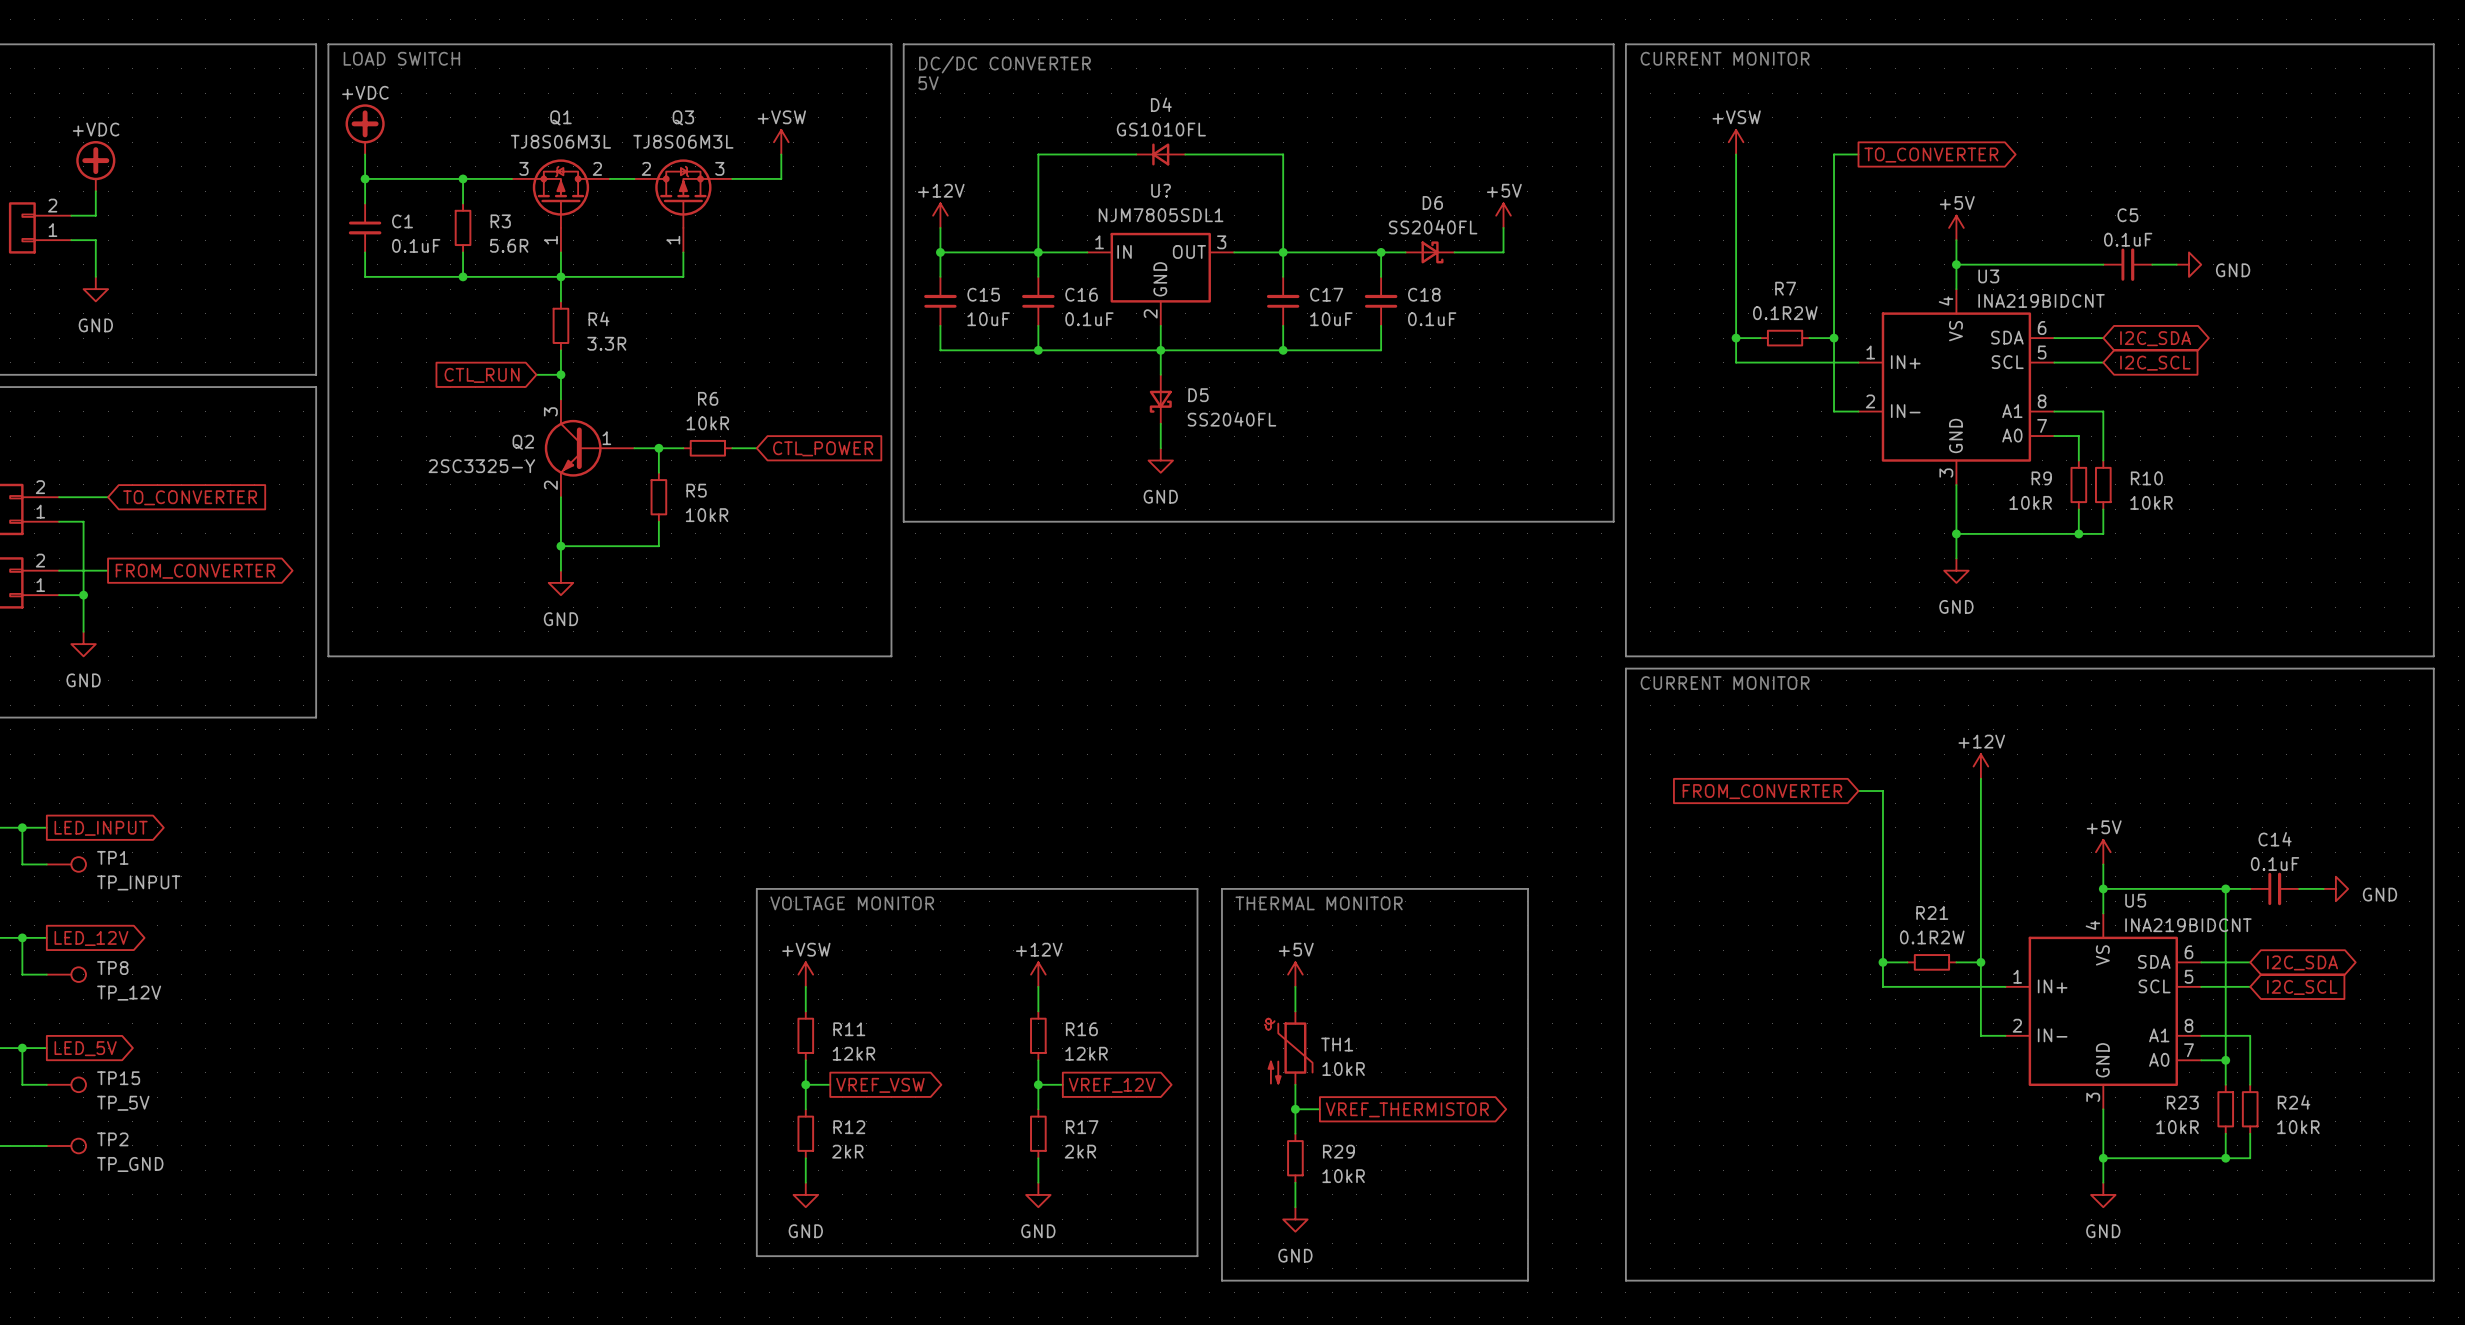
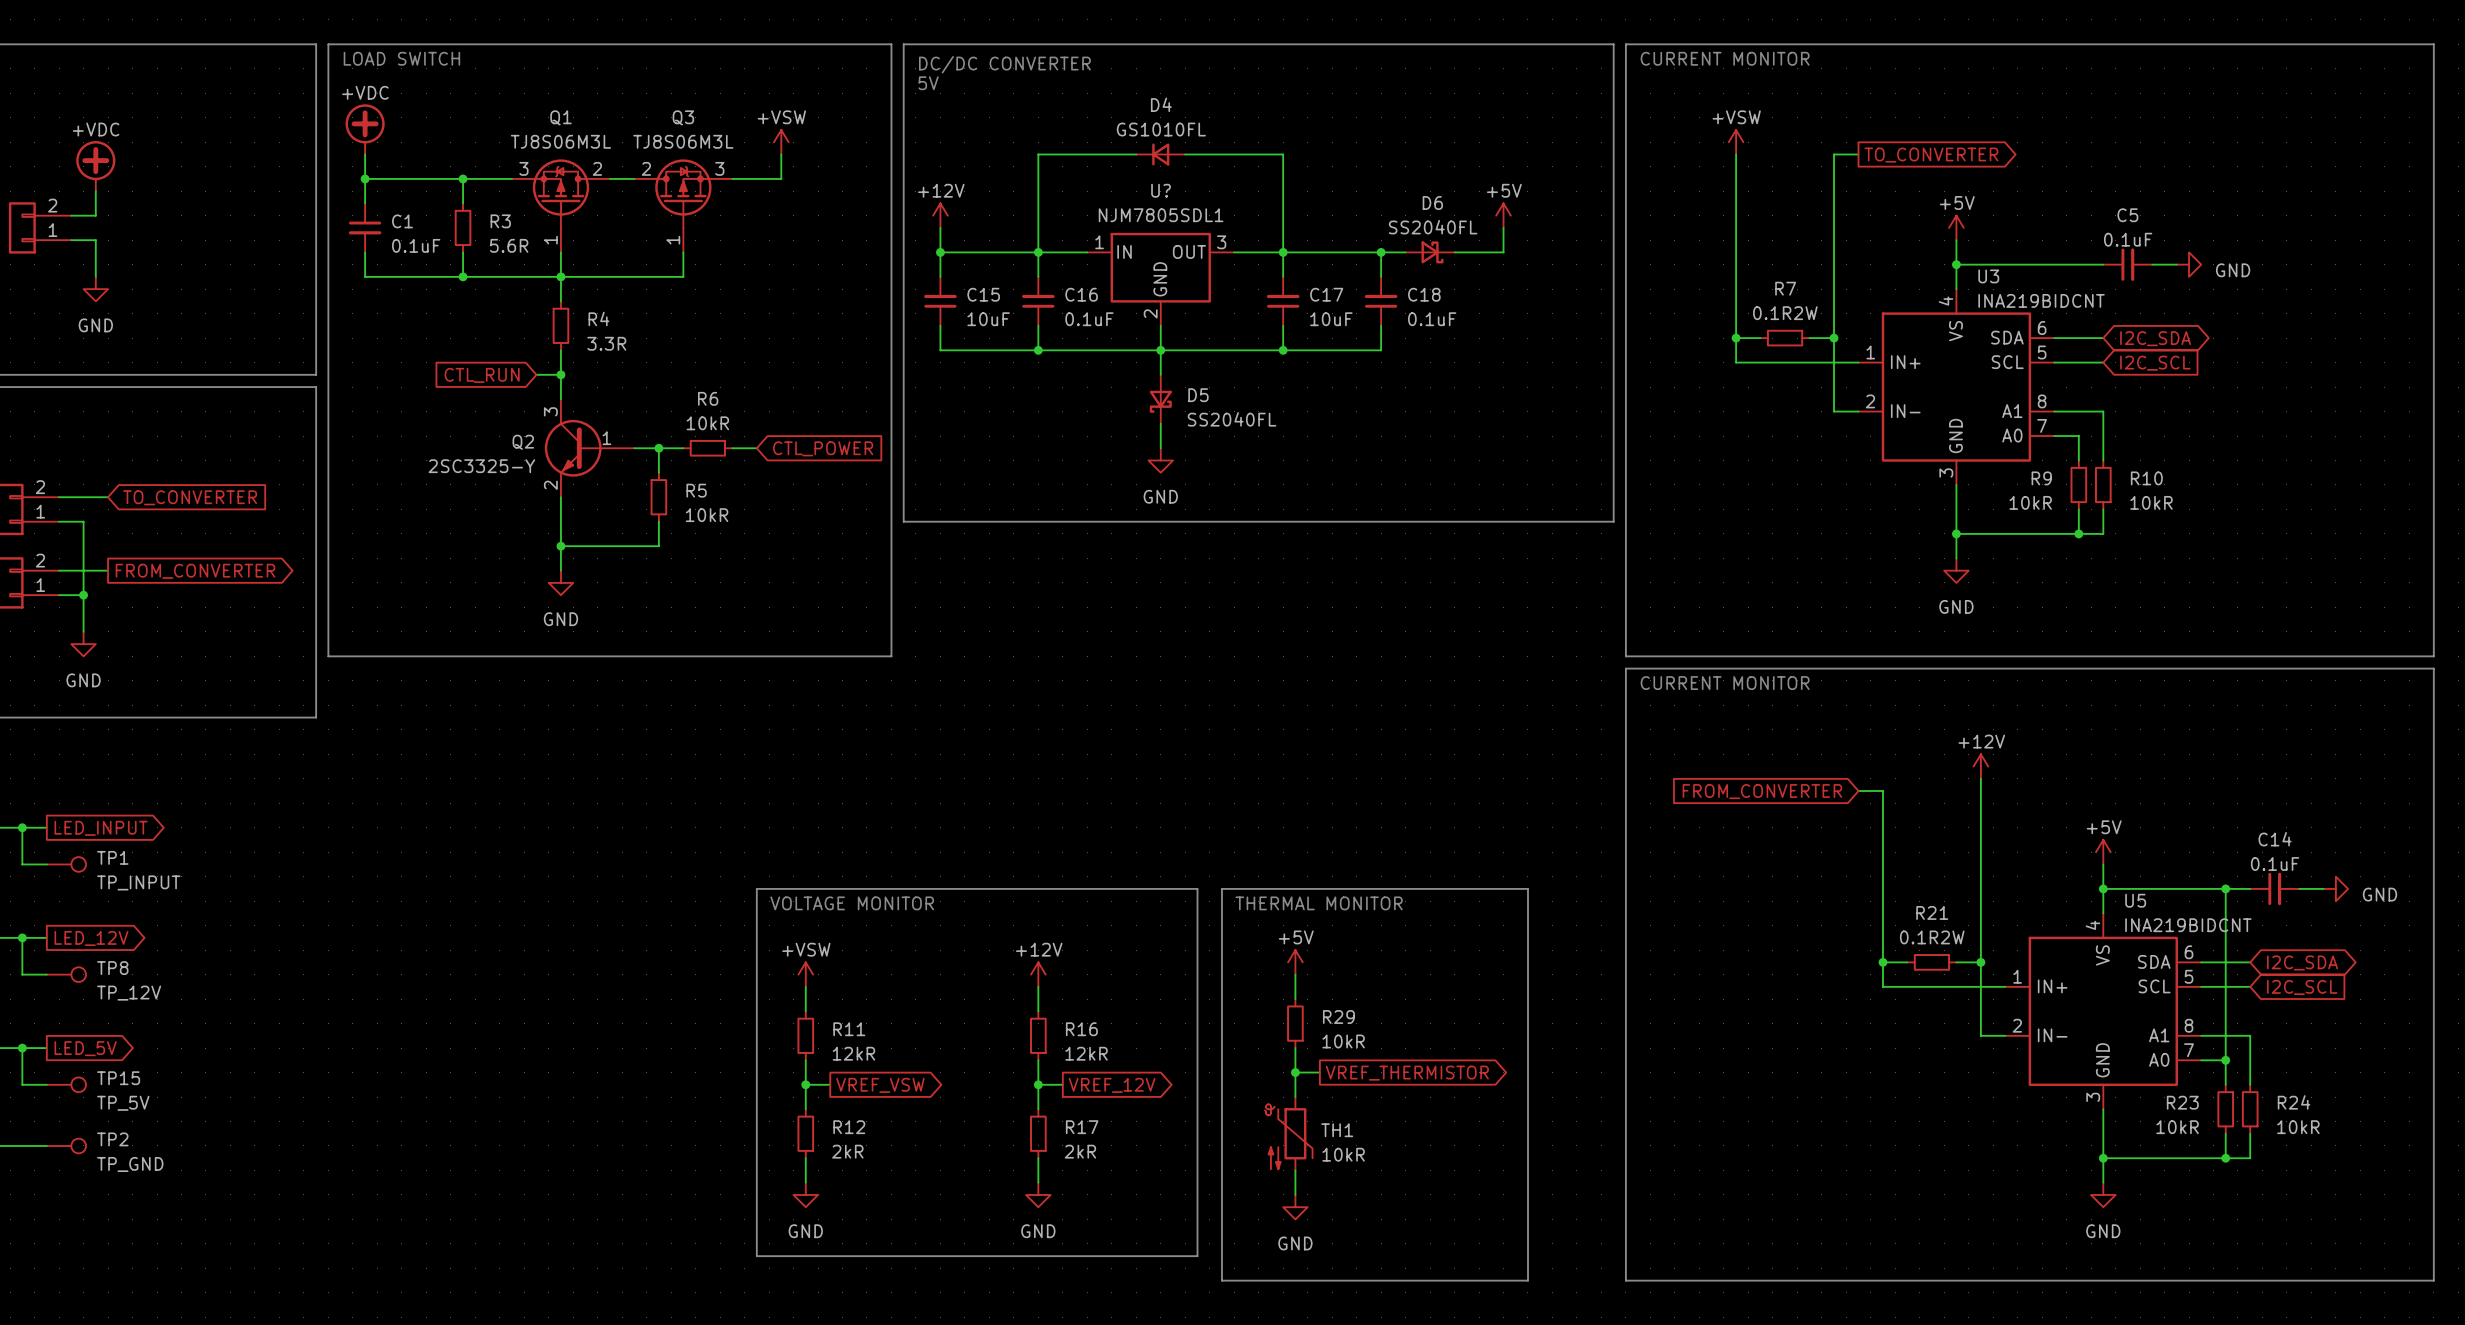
power symbol position: +5V (1295, 974) -> +5V (1295, 962)
TH1 position: (1288, 1048) -> (1288, 1133)
wire: (1295, 1097) (1295, 1133) -> (1295, 1048) (1295, 1084)
wire: (1295, 1109) (1319, 1109) -> (1295, 1072) (1319, 1072)
junction position: (1295, 1109) -> (1295, 1072)
global label position: VREF_THERMISTOR (1407, 1109) -> VREF_THERMISTOR (1407, 1073)
R29 position: (1295, 1158) -> (1295, 1023)
power symbol position: GND (1295, 1219) -> GND (1295, 1207)

